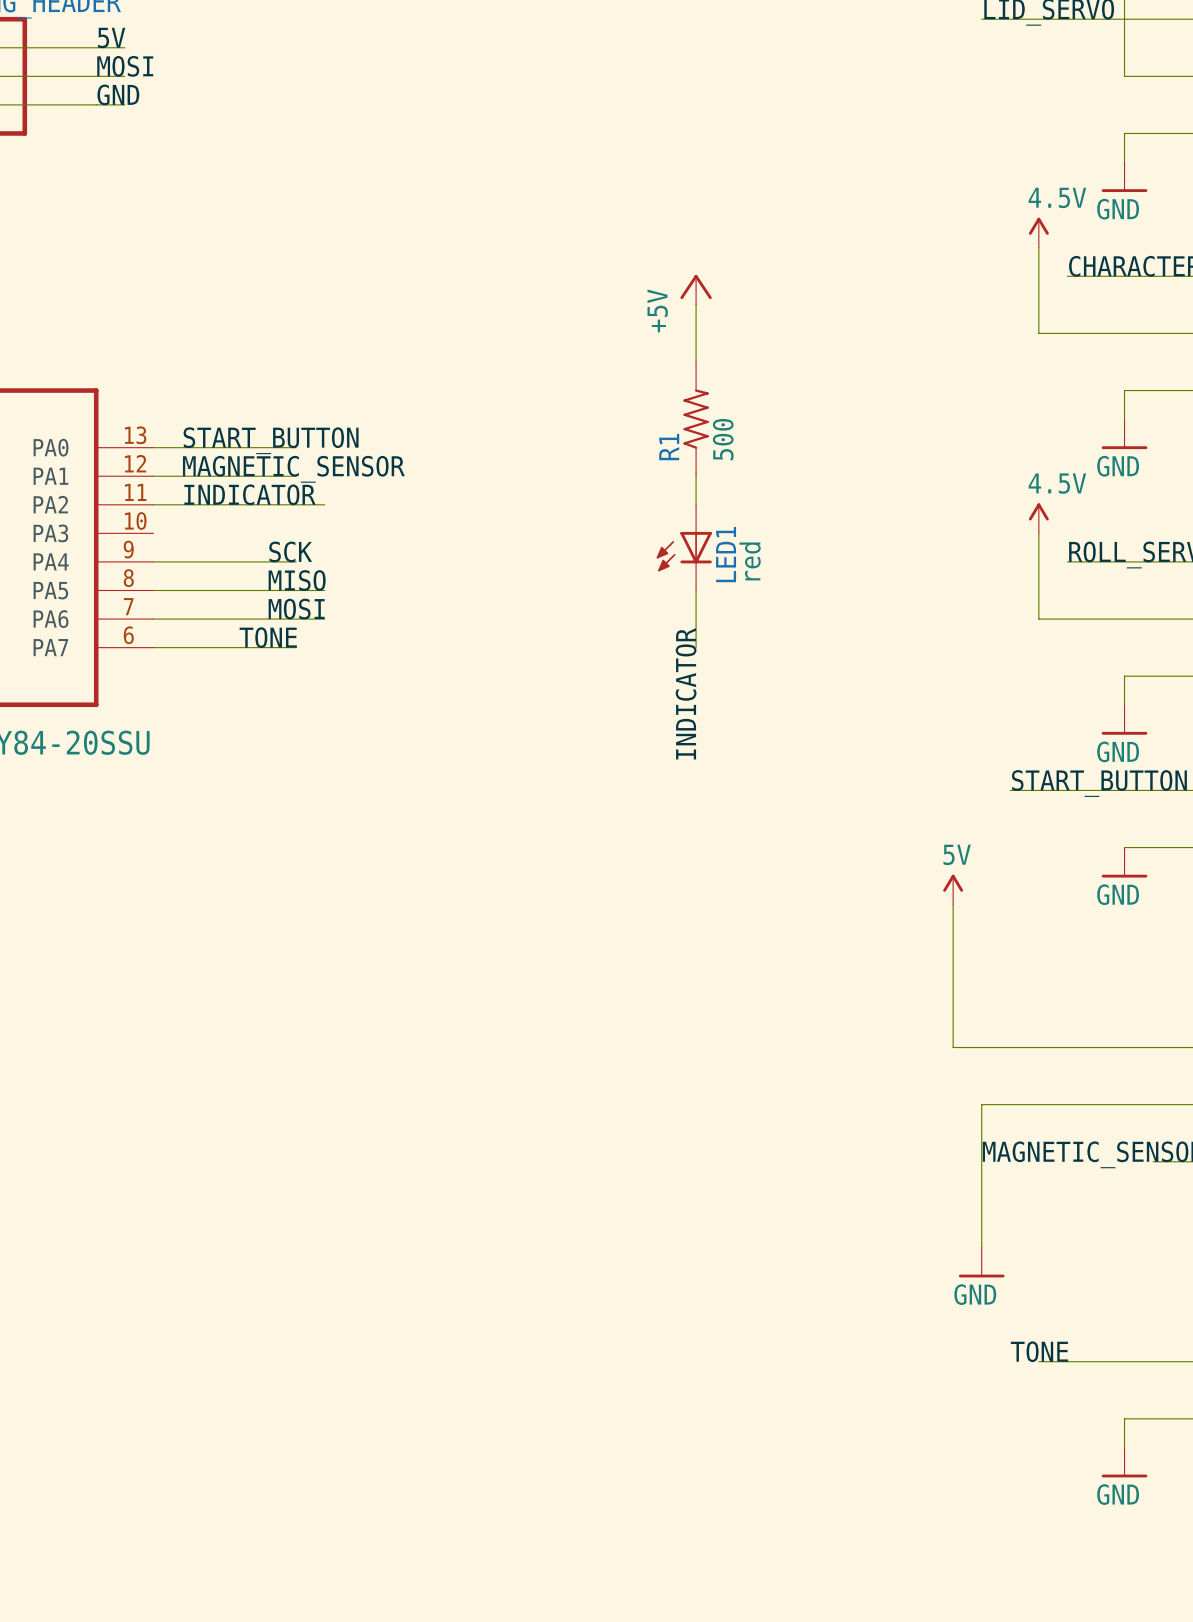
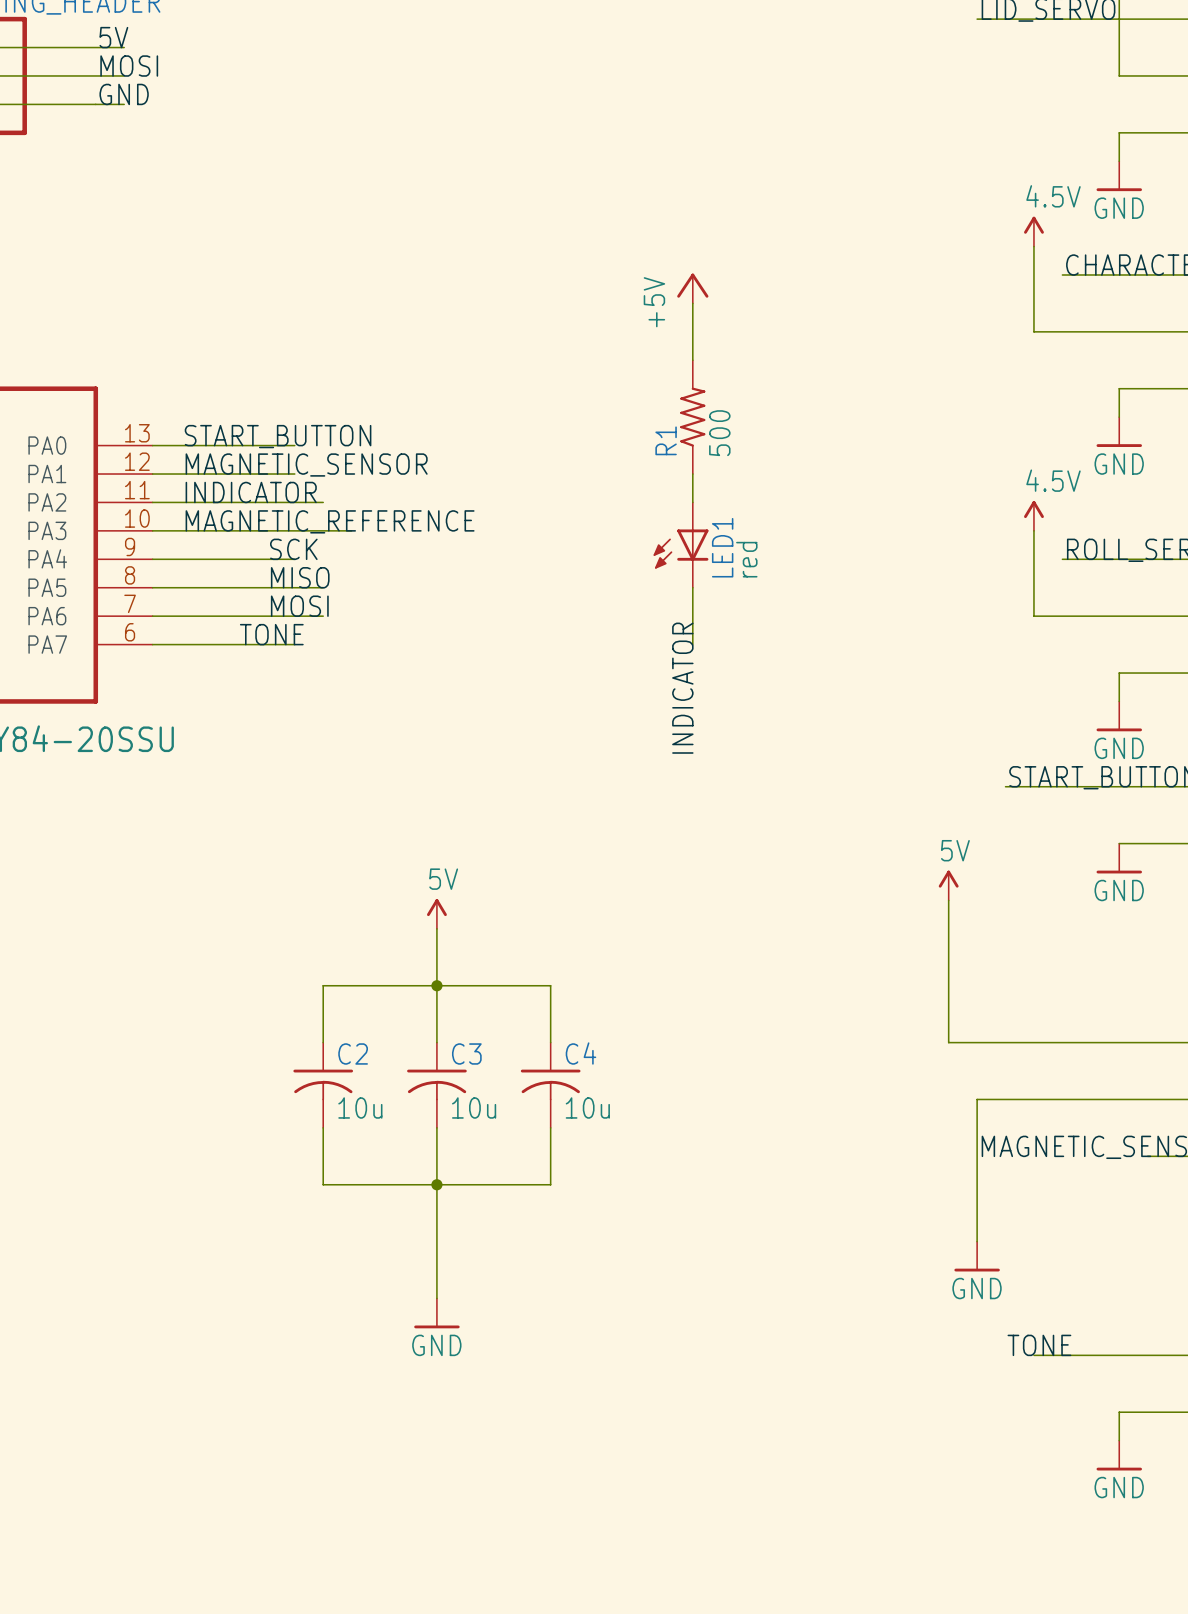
label: none -> MAGNETIC_REFERENCE (330, 521)
wire: none -> (152, 530) (351, 530)
power symbol: none -> 5V (436, 913)
wire: none -> (436, 928) (436, 1042)
junction: none -> (436, 985)
wire: none -> (323, 1042) (323, 985) (550, 985) (550, 1042)
C2: none -> 10u (323, 1085)
C3: none -> 10u (436, 1085)
C4: none -> 10u (550, 1085)
wire: none -> (323, 1127) (323, 1184) (550, 1184) (550, 1127)
wire: none -> (436, 1127) (436, 1298)
junction: none -> (436, 1184)
power symbol: none -> GND (436, 1313)

